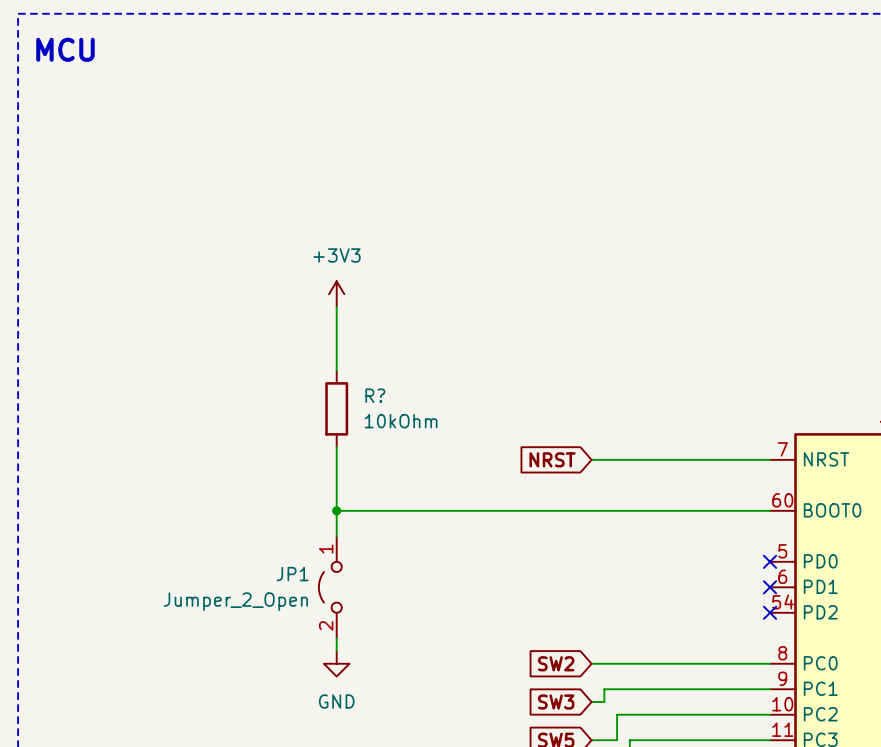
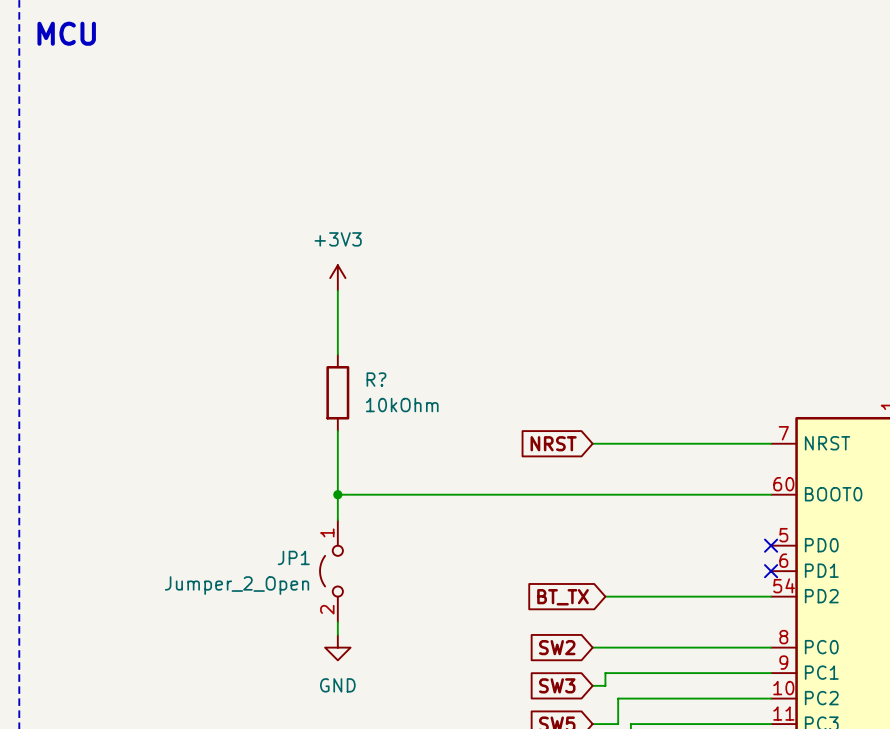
wire: none -> (605, 596) (771, 596)
no-connect mark: (770, 612) -> none
global label: none -> BT_TX (563, 597)

